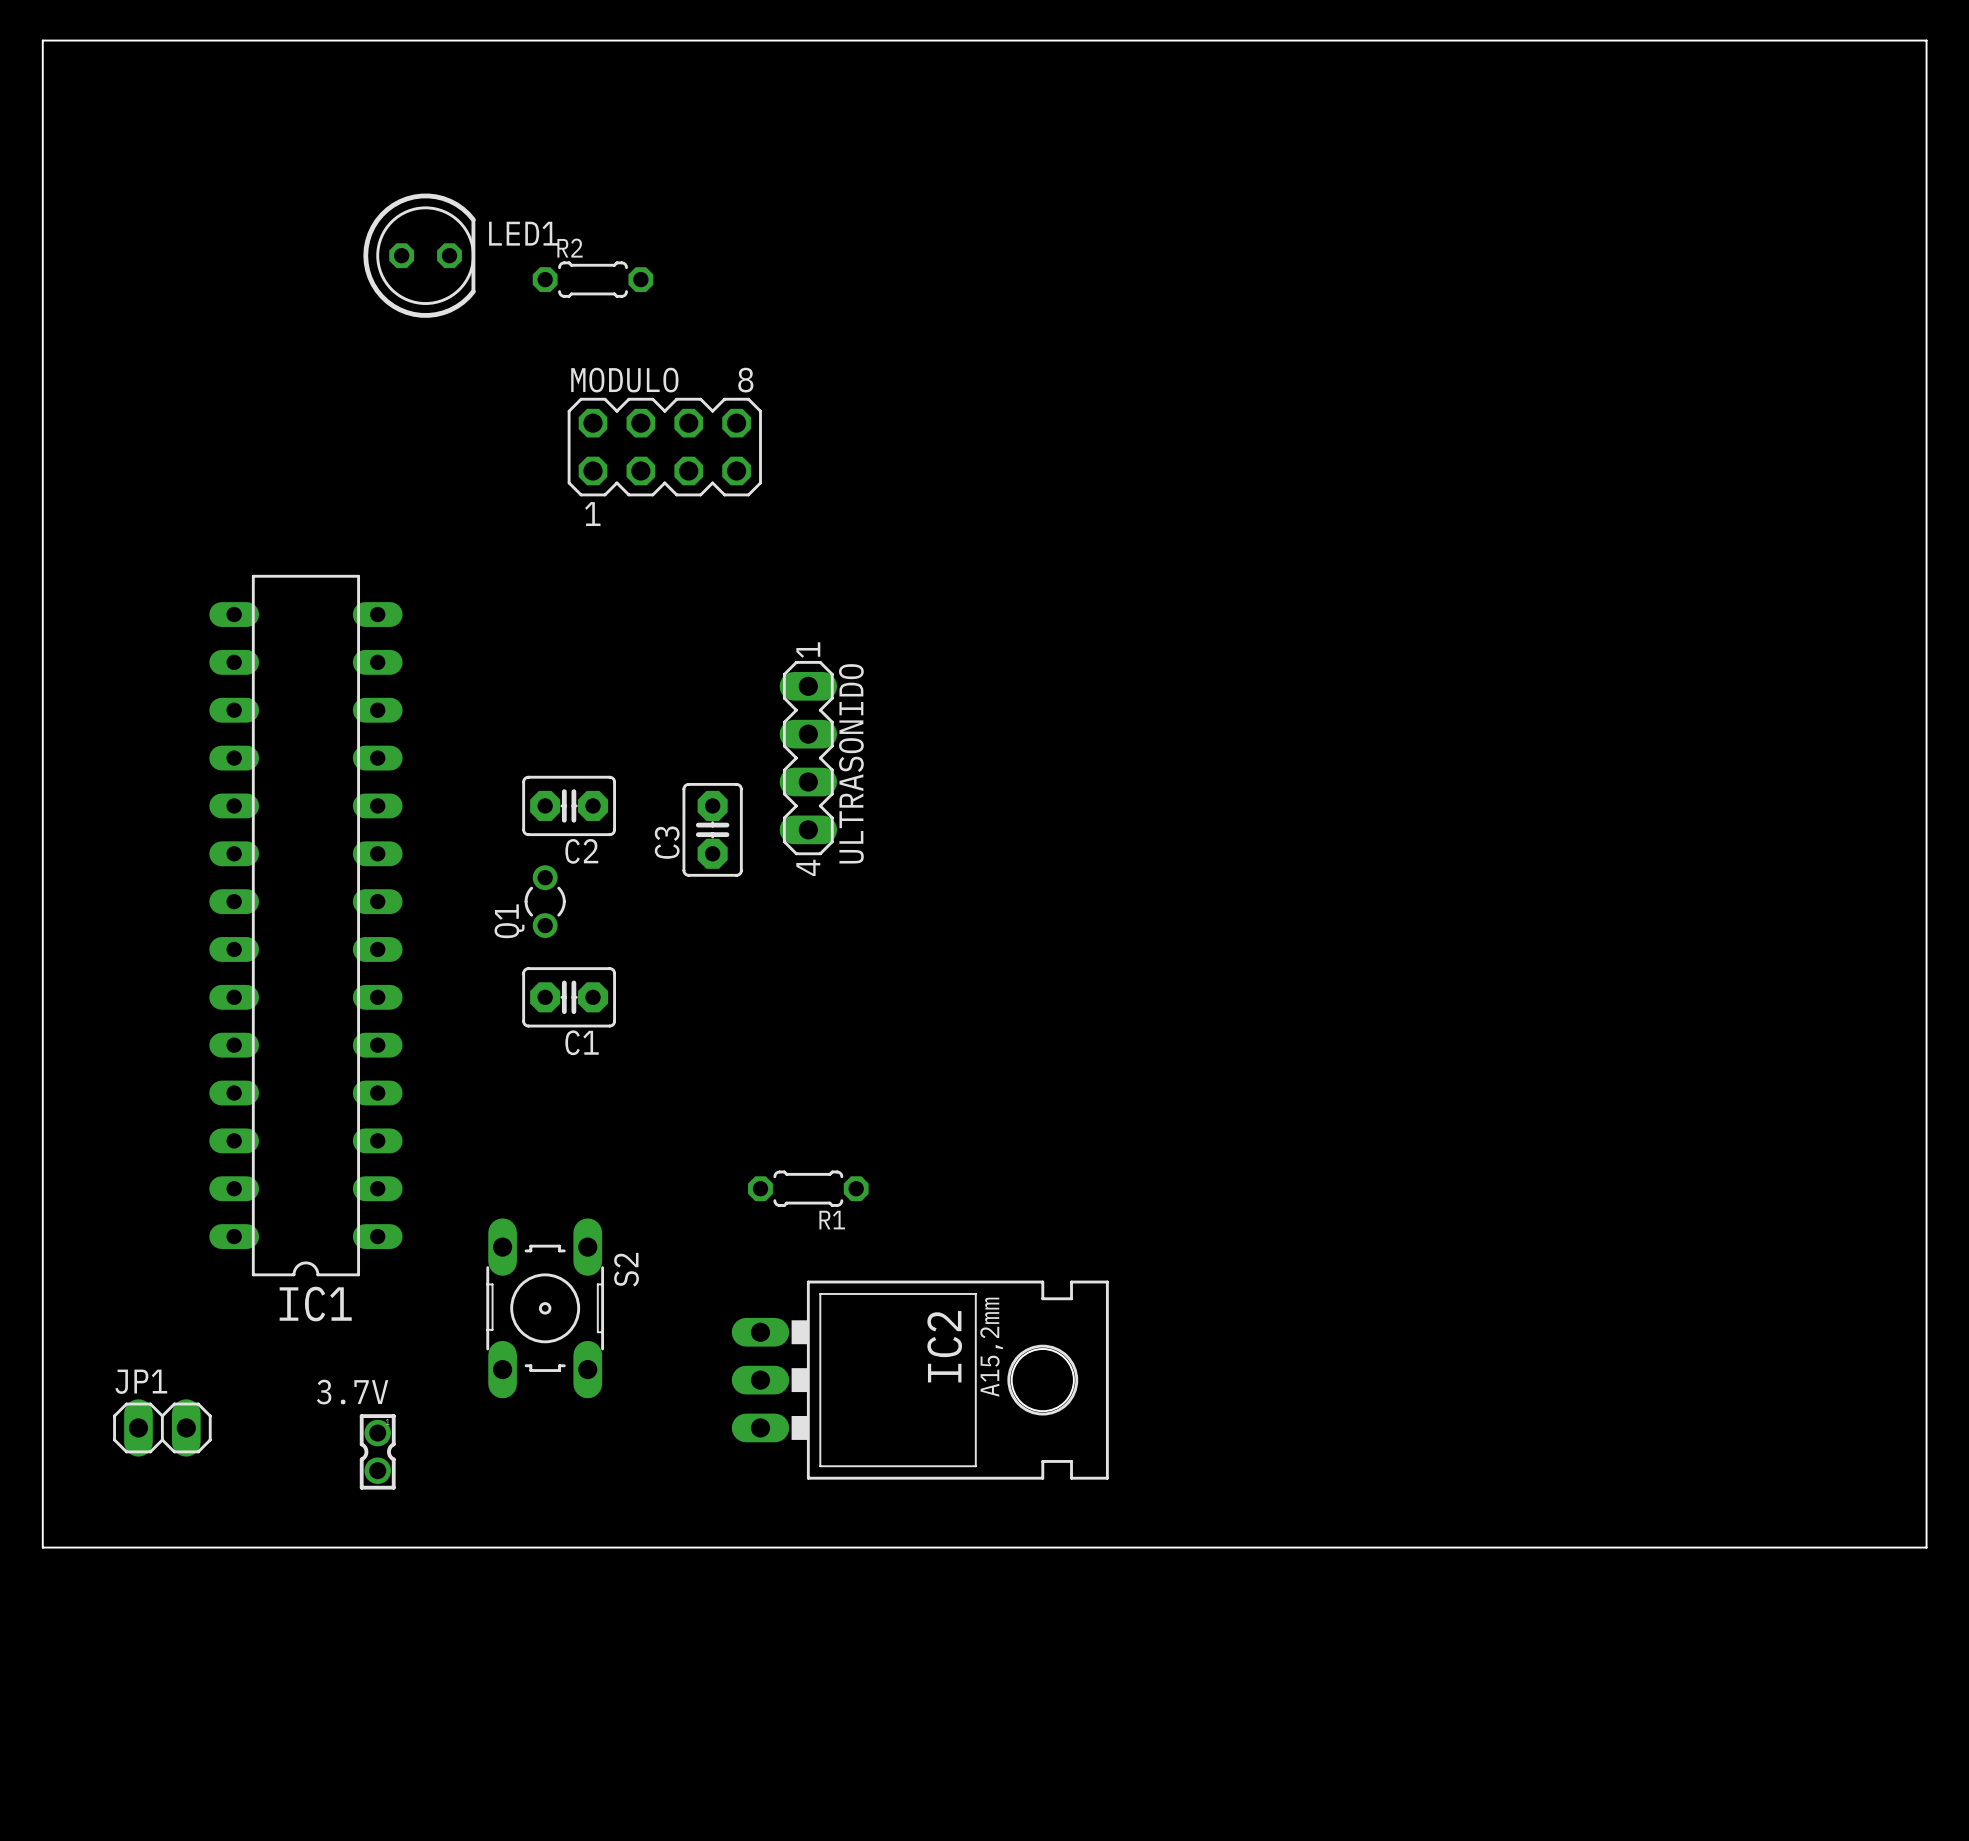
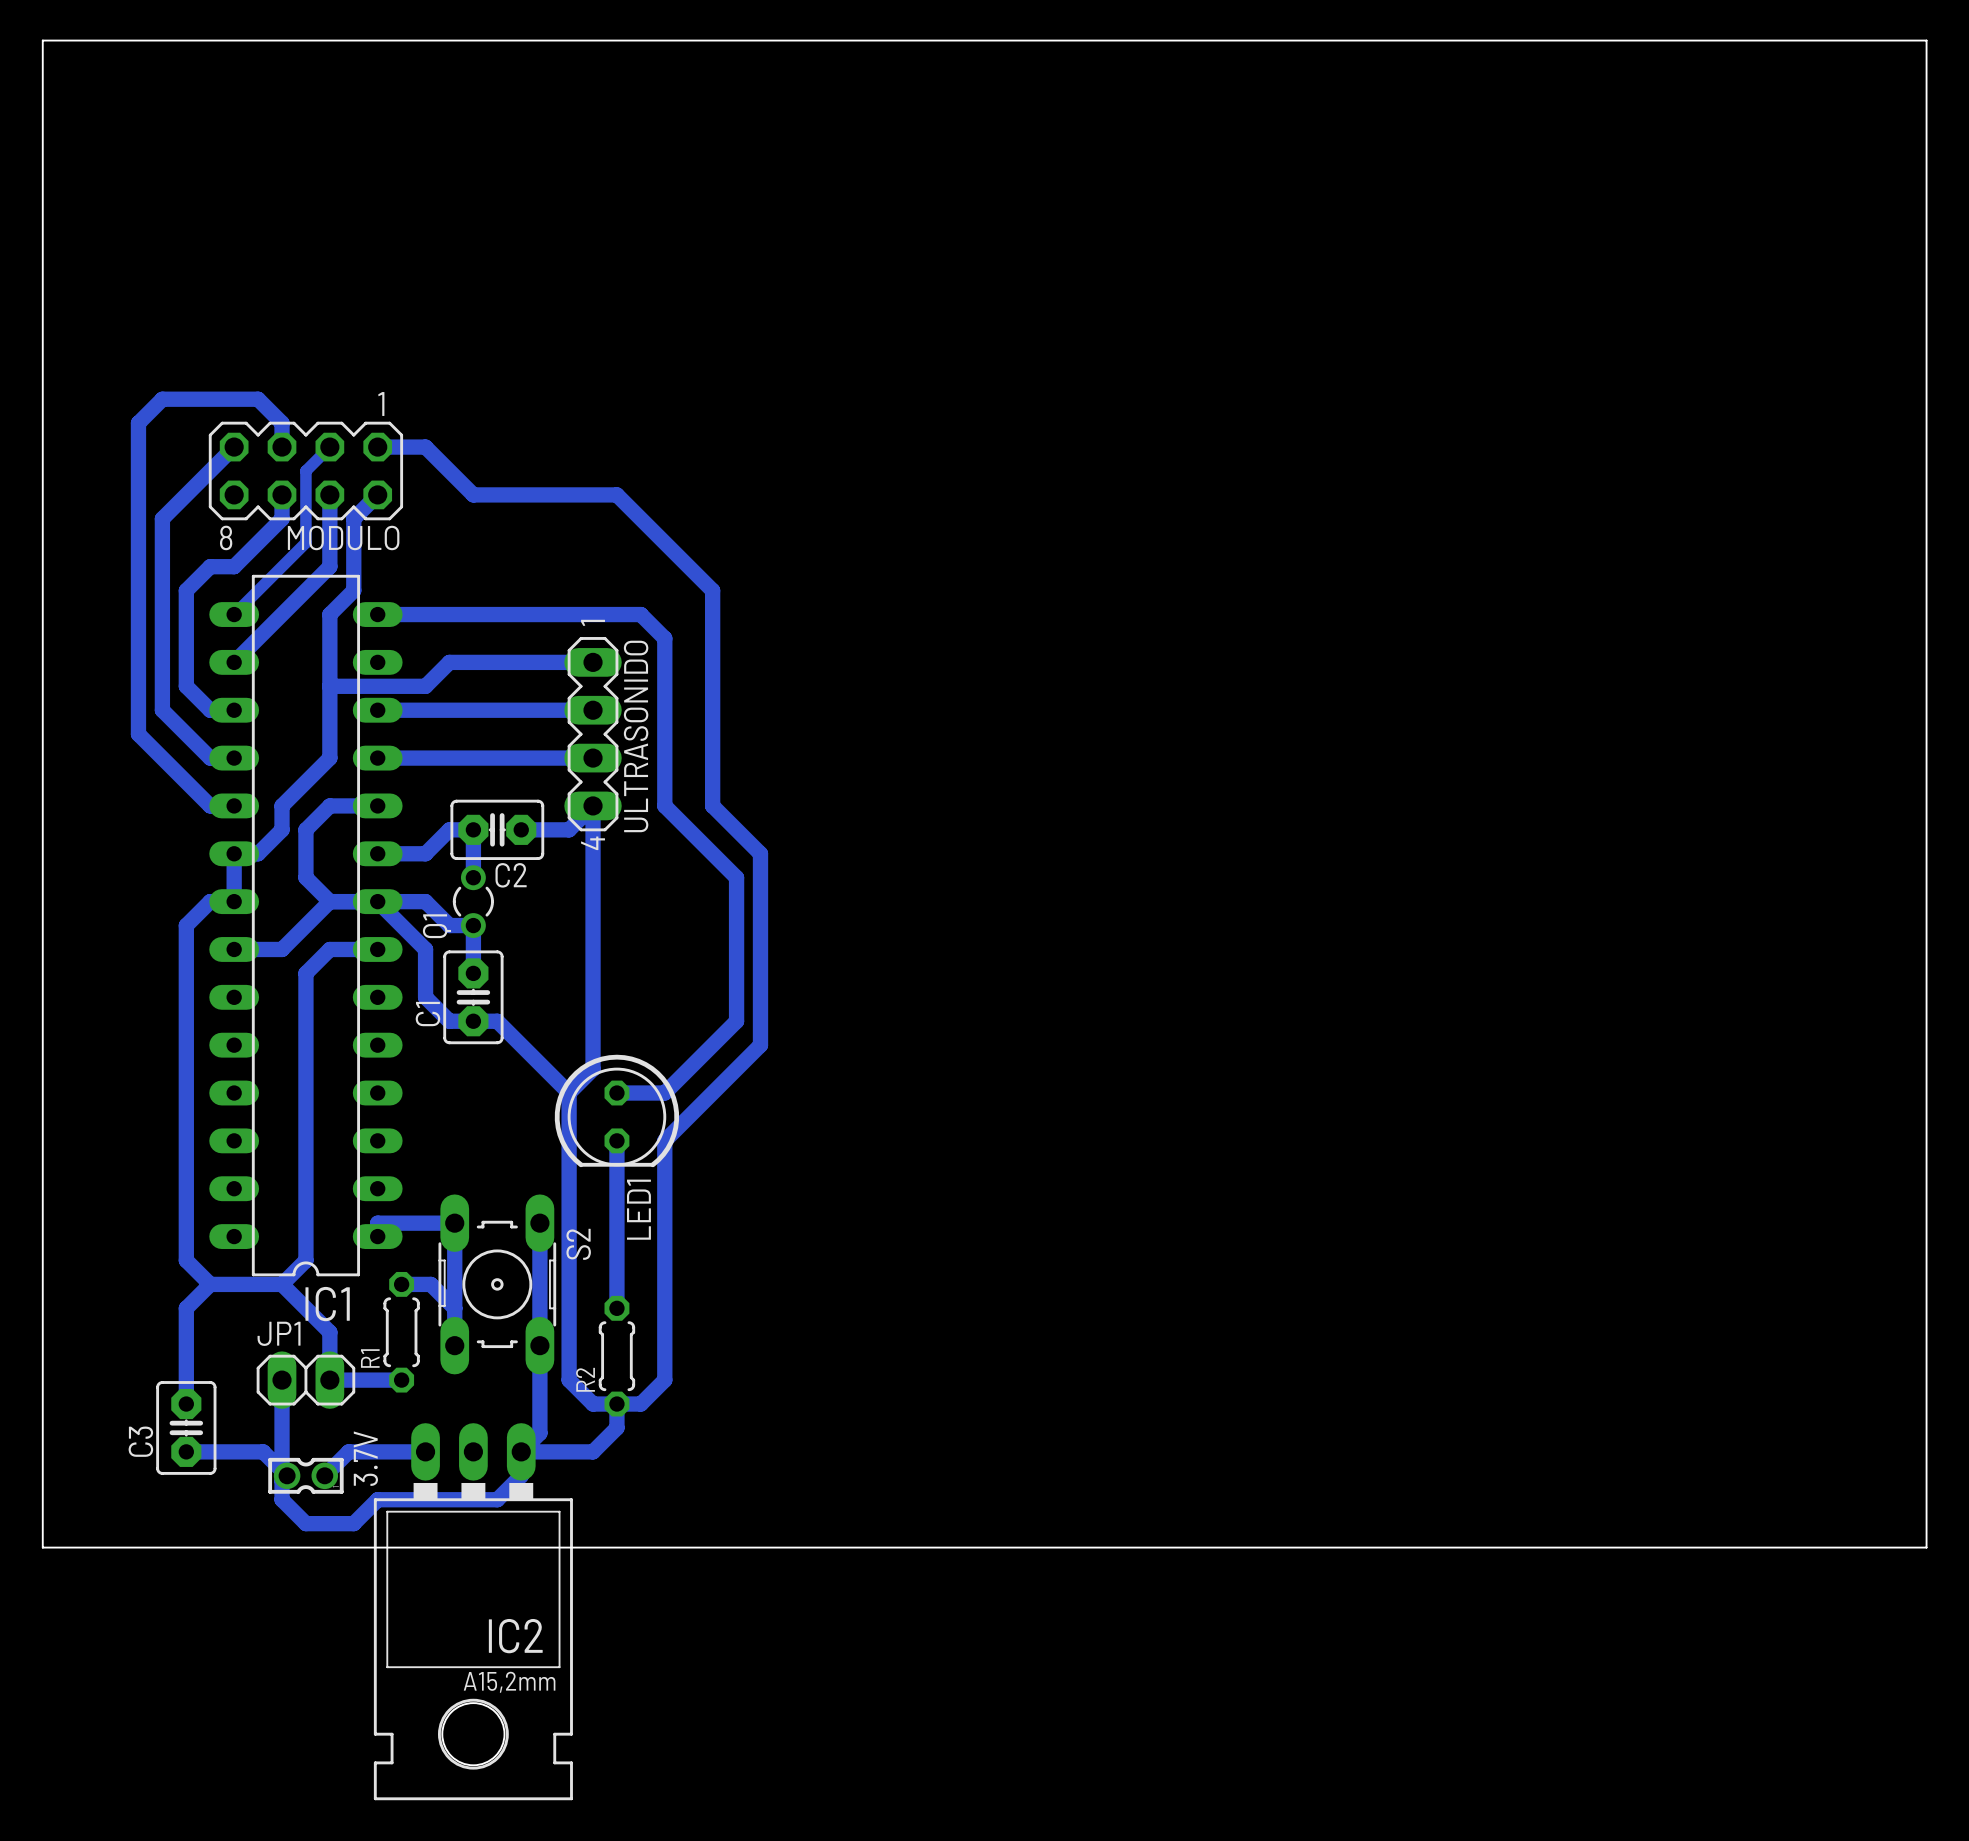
R2 name position: R2 (569, 248) -> R2 (585, 1379)
LED1 rotation: 0° (419, 255) -> 90° clockwise (616, 1110)
LED1 position: (419, 255) -> (616, 1110)
R2 rotation: 0° (593, 279) -> 90° clockwise (616, 1356)
R2 position: (593, 279) -> (616, 1356)
bottom track: none -> (234, 447) (162, 518) (162, 710) (210, 758) (234, 758)
bottom track: none -> (282, 447) (282, 423) (258, 399) (162, 399) (138, 423) (138, 734) (210, 805) (234, 805)
bottom track: none -> (329, 447) (305, 471) (305, 542) (234, 614)
bottom track: none -> (377, 447) (425, 447) (473, 494) (616, 494) (712, 590) (712, 805) (760, 853) (760, 1045) (664, 1140) (664, 1380) (640, 1404) (593, 1404) (569, 1380) (569, 1093)
MODULO: (664, 447) -> none
MODULO: none -> (305, 471)
bottom track: none -> (282, 494) (282, 518) (234, 566) (210, 566) (186, 590) (186, 686) (210, 710) (234, 710)
bottom track: none -> (329, 494) (329, 566) (234, 662)
bottom track: none -> (377, 494) (353, 518) (353, 590) (329, 614) (329, 758) (282, 805) (282, 829) (258, 853) (234, 853) (234, 901) (210, 901) (186, 925) (186, 1260) (210, 1284)
bottom track: none -> (377, 614) (640, 614) (664, 638) (664, 805) (736, 877) (736, 1021) (664, 1093) (616, 1093)
bottom track: none -> (593, 662) (449, 662) (425, 686) (329, 686)
bottom track: none -> (377, 710) (593, 710)
bottom track: none -> (377, 758) (593, 758)
ULTRASONIDO position: (808, 758) -> (593, 734)
bottom track: none -> (377, 805) (329, 805) (305, 829) (305, 877) (329, 901)
C2 position: (569, 805) -> (497, 829)
bottom track: none -> (521, 829) (569, 829) (593, 805) (593, 1069) (569, 1093)
C3 position: (712, 829) -> (186, 1427)
bottom track: none -> (377, 853) (425, 853) (449, 829) (473, 829) (473, 877)
bottom track: none -> (329, 901) (425, 901) (449, 925) (473, 925) (473, 973)
bottom track: none -> (329, 901) (282, 949) (234, 949)
bottom track: none -> (377, 901) (425, 949) (425, 997) (449, 1021) (497, 1021) (569, 1093)
Q1 position: (545, 901) -> (473, 901)
bottom track: none -> (377, 949) (329, 949) (305, 973) (305, 1260) (282, 1284)
C1 rotation: 0° (569, 997) -> 90° clockwise (473, 997)
C1 position: (569, 997) -> (473, 997)
bottom track: none -> (616, 1140) (616, 1308)
R1 rotation: 0° (808, 1188) -> 90° clockwise (401, 1332)
R1 position: (808, 1188) -> (401, 1332)
bottom track: none -> (539, 1223) (539, 1433) (521, 1451)
bottom track: none -> (377, 1236) (377, 1223) (454, 1223) (454, 1345)
bottom track: none -> (210, 1284) (282, 1284)
bottom track: none -> (210, 1284) (186, 1308) (186, 1404)
bottom track: none -> (282, 1284) (329, 1332) (329, 1380) (401, 1380)
bottom track: none -> (401, 1284) (430, 1284) (454, 1308)
S2 position: (545, 1308) -> (497, 1284)
bottom track: none -> (282, 1380) (282, 1475) (287, 1475)
IC2 rotation: 0° (920, 1380) -> 90° clockwise (473, 1611)
IC2 position: (920, 1380) -> (473, 1611)
3.7V name position: 3.7V (352, 1392) -> 3.7V (365, 1458)
bottom track: none -> (616, 1404) (616, 1427) (593, 1451) (521, 1451)
3.7V footprint: [359, 1414, 396, 1490] -> [268, 1457, 344, 1494]
JP1 position: (162, 1427) -> (305, 1380)
bottom track: none -> (186, 1451) (263, 1451) (287, 1475)
bottom track: none -> (425, 1451) (348, 1451) (324, 1475)
bottom track: none -> (521, 1451) (521, 1475) (497, 1499) (377, 1499) (353, 1523) (305, 1523) (282, 1499) (282, 1480) (287, 1475)

